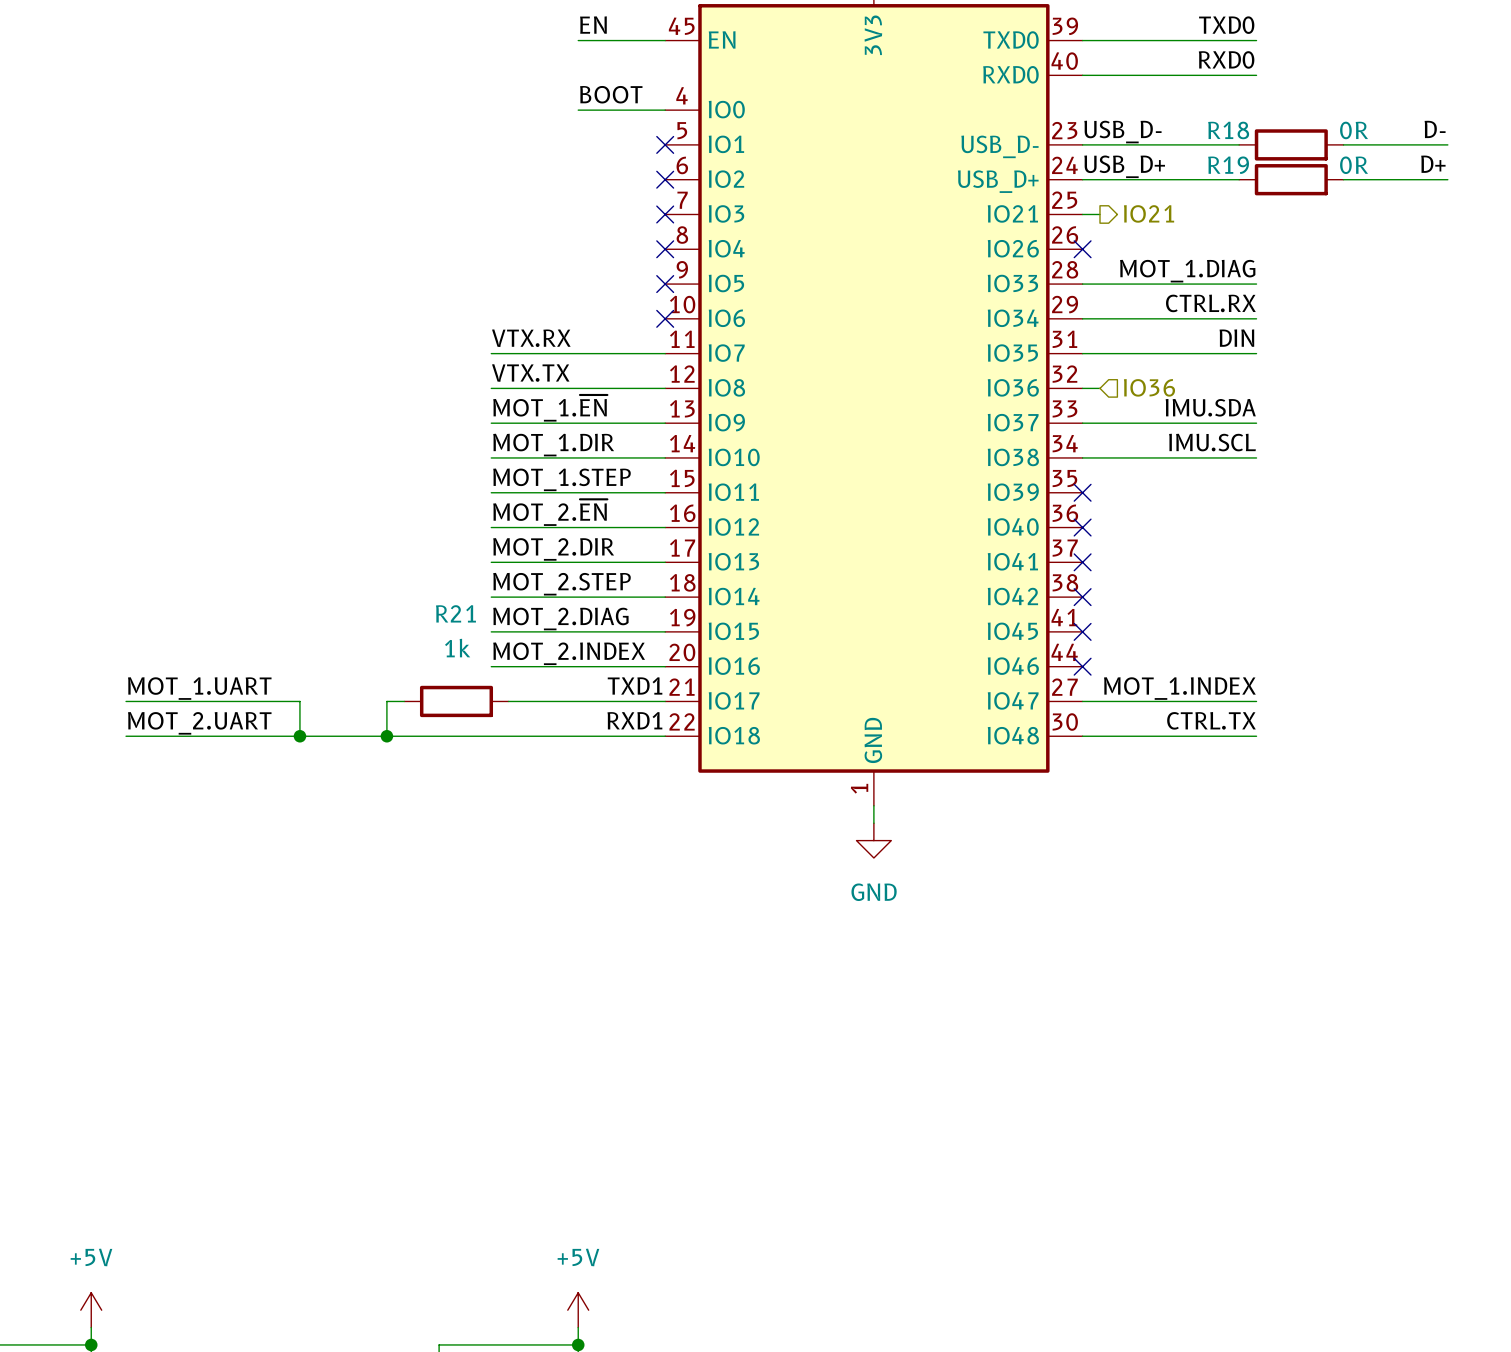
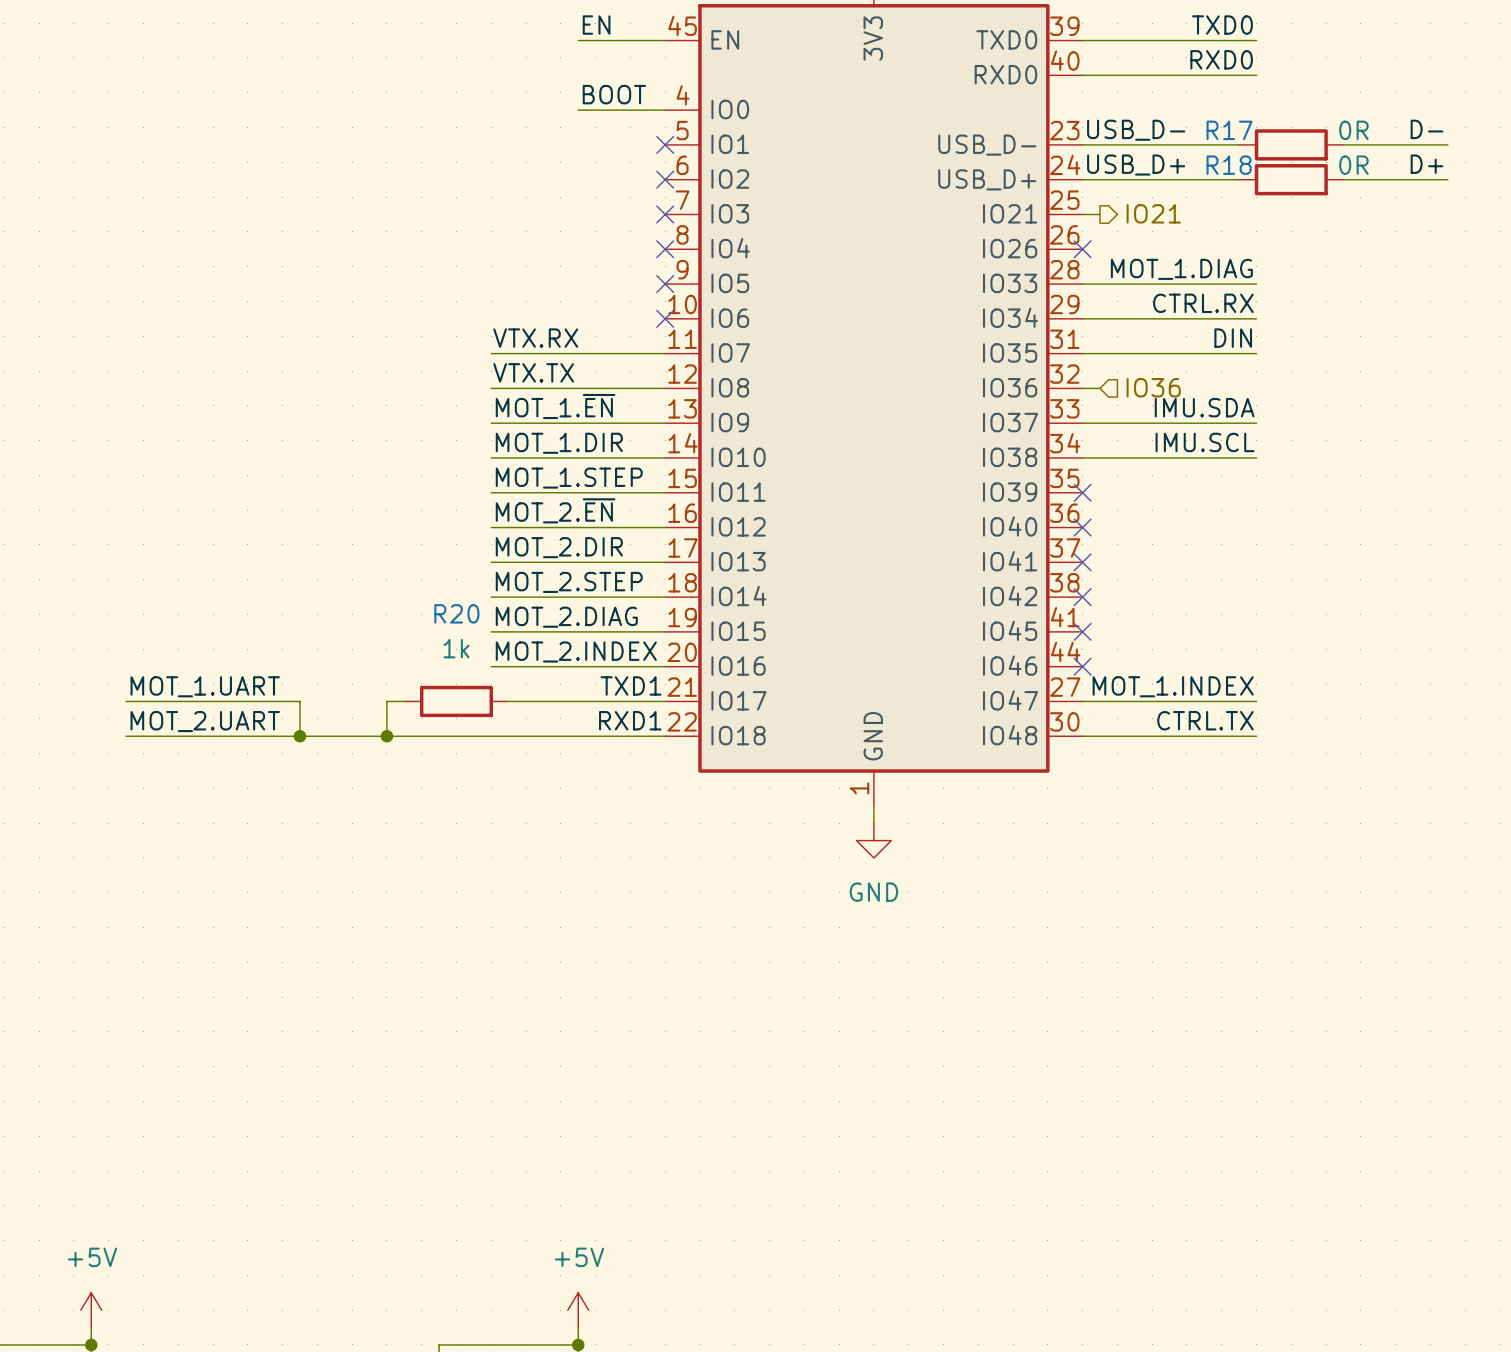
R18 name: R18 (1228, 130) -> R17 (1229, 130)
R19 name: R19 (1228, 165) -> R18 (1229, 165)
R21 name: R21 (455, 613) -> R20 (456, 613)

